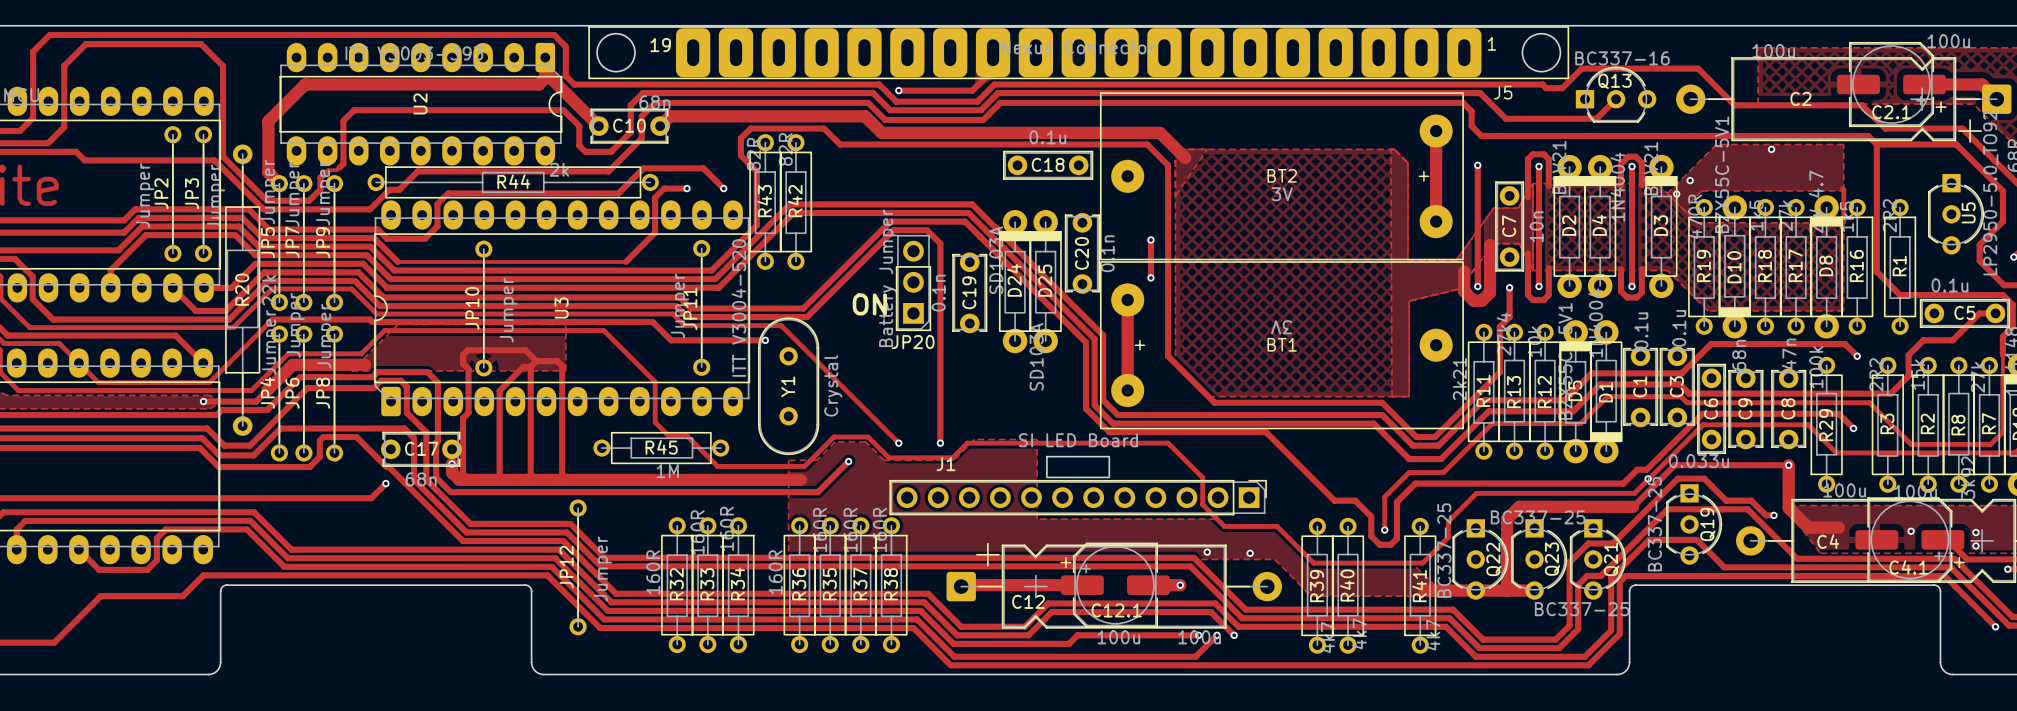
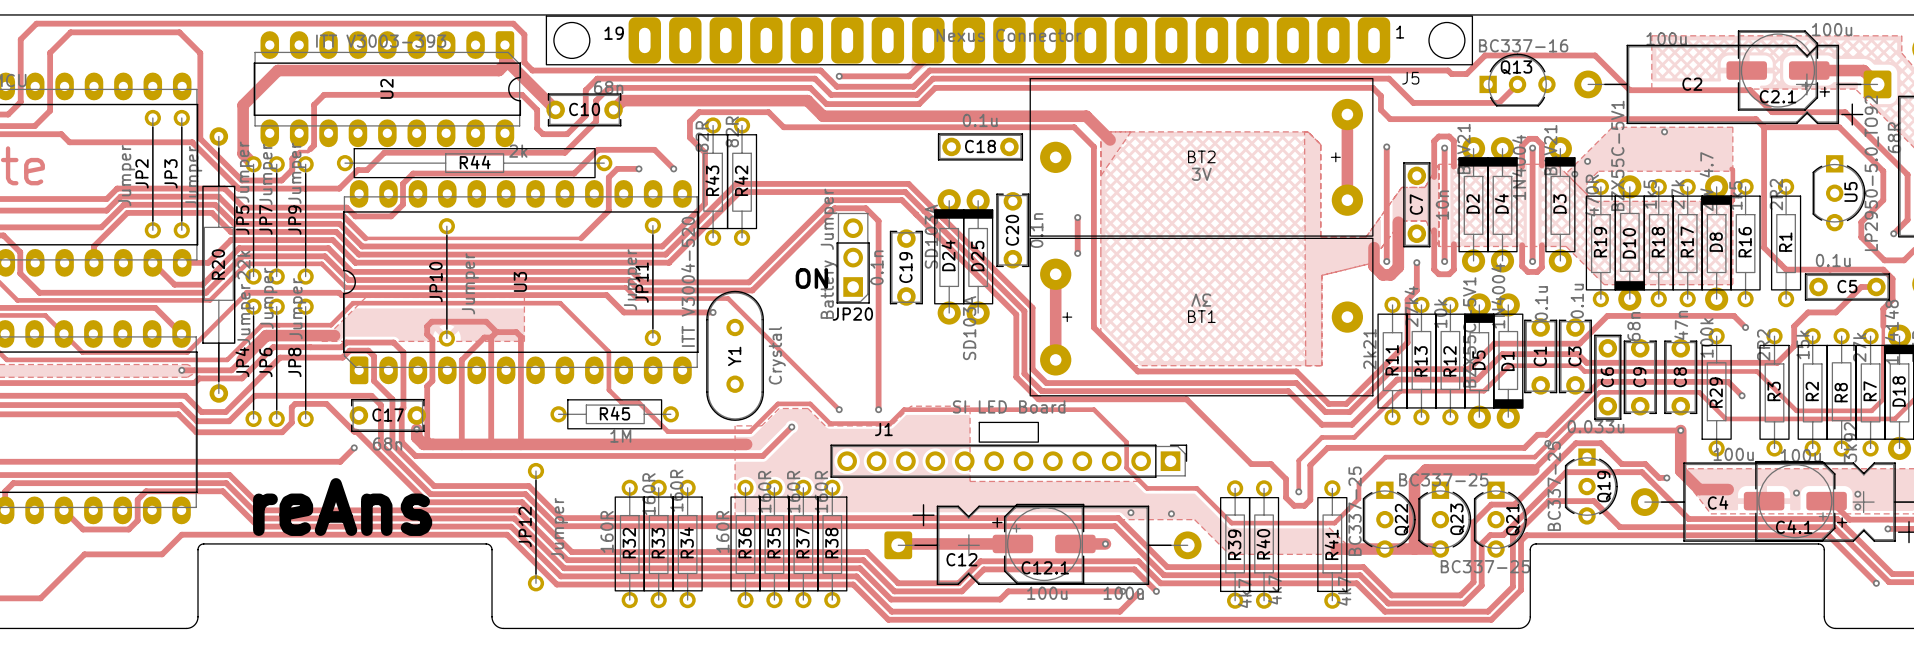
text: none -> reAns (342, 507)

